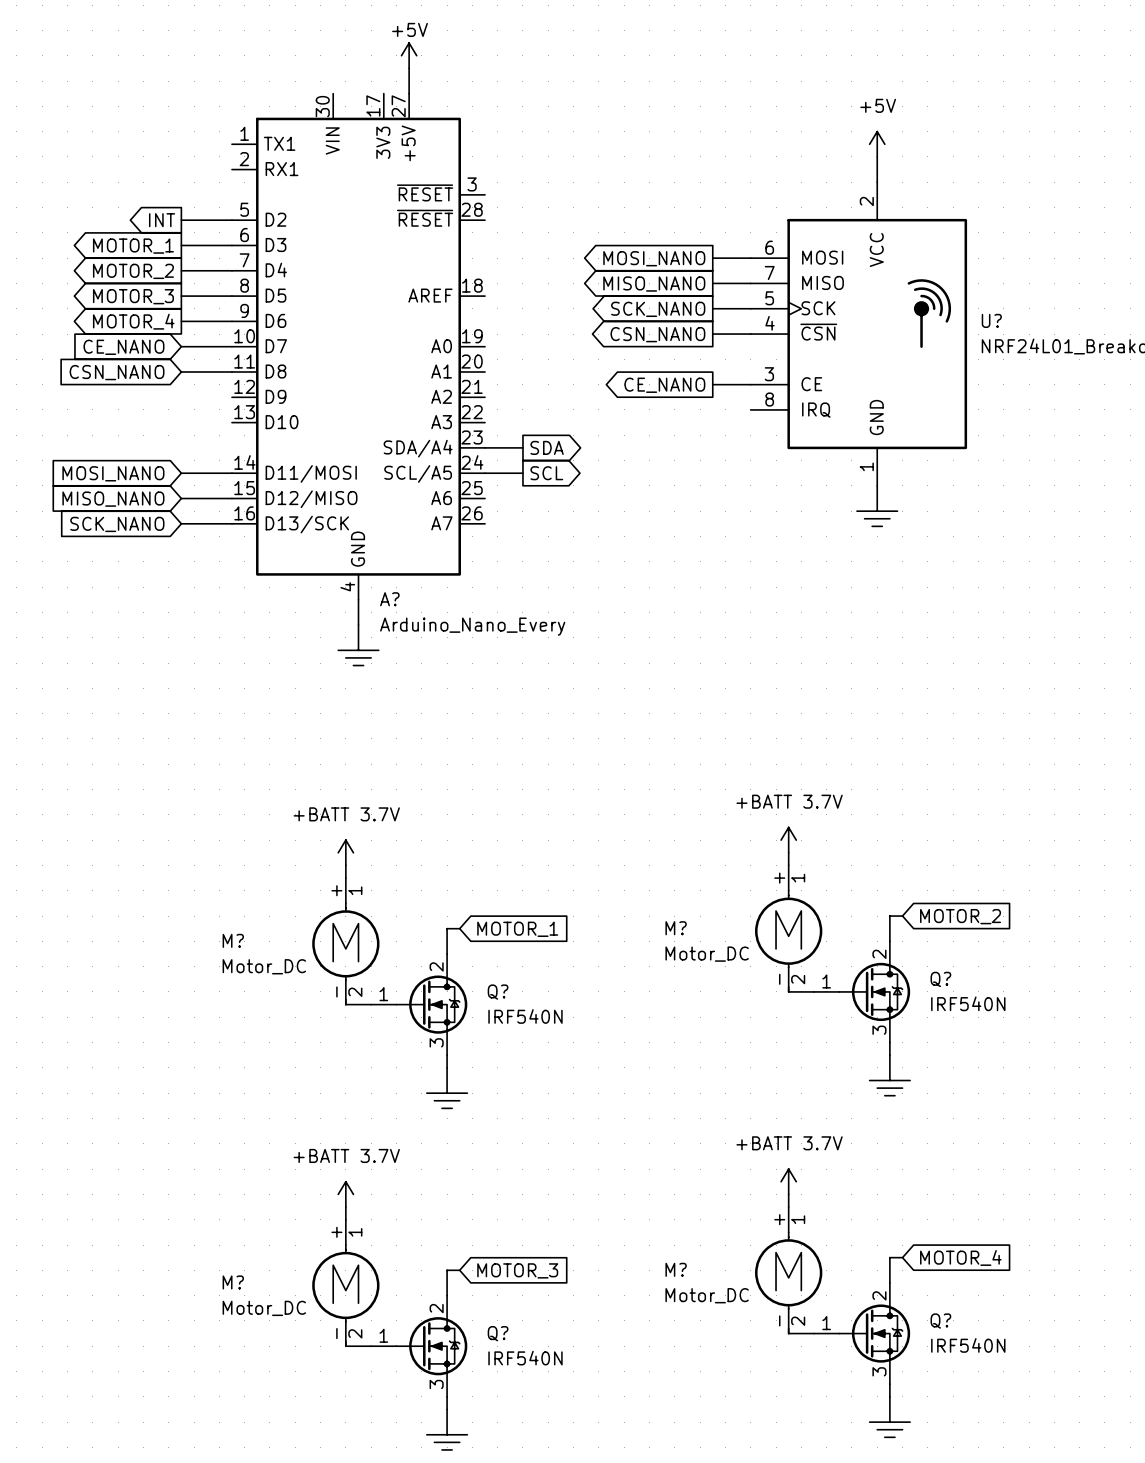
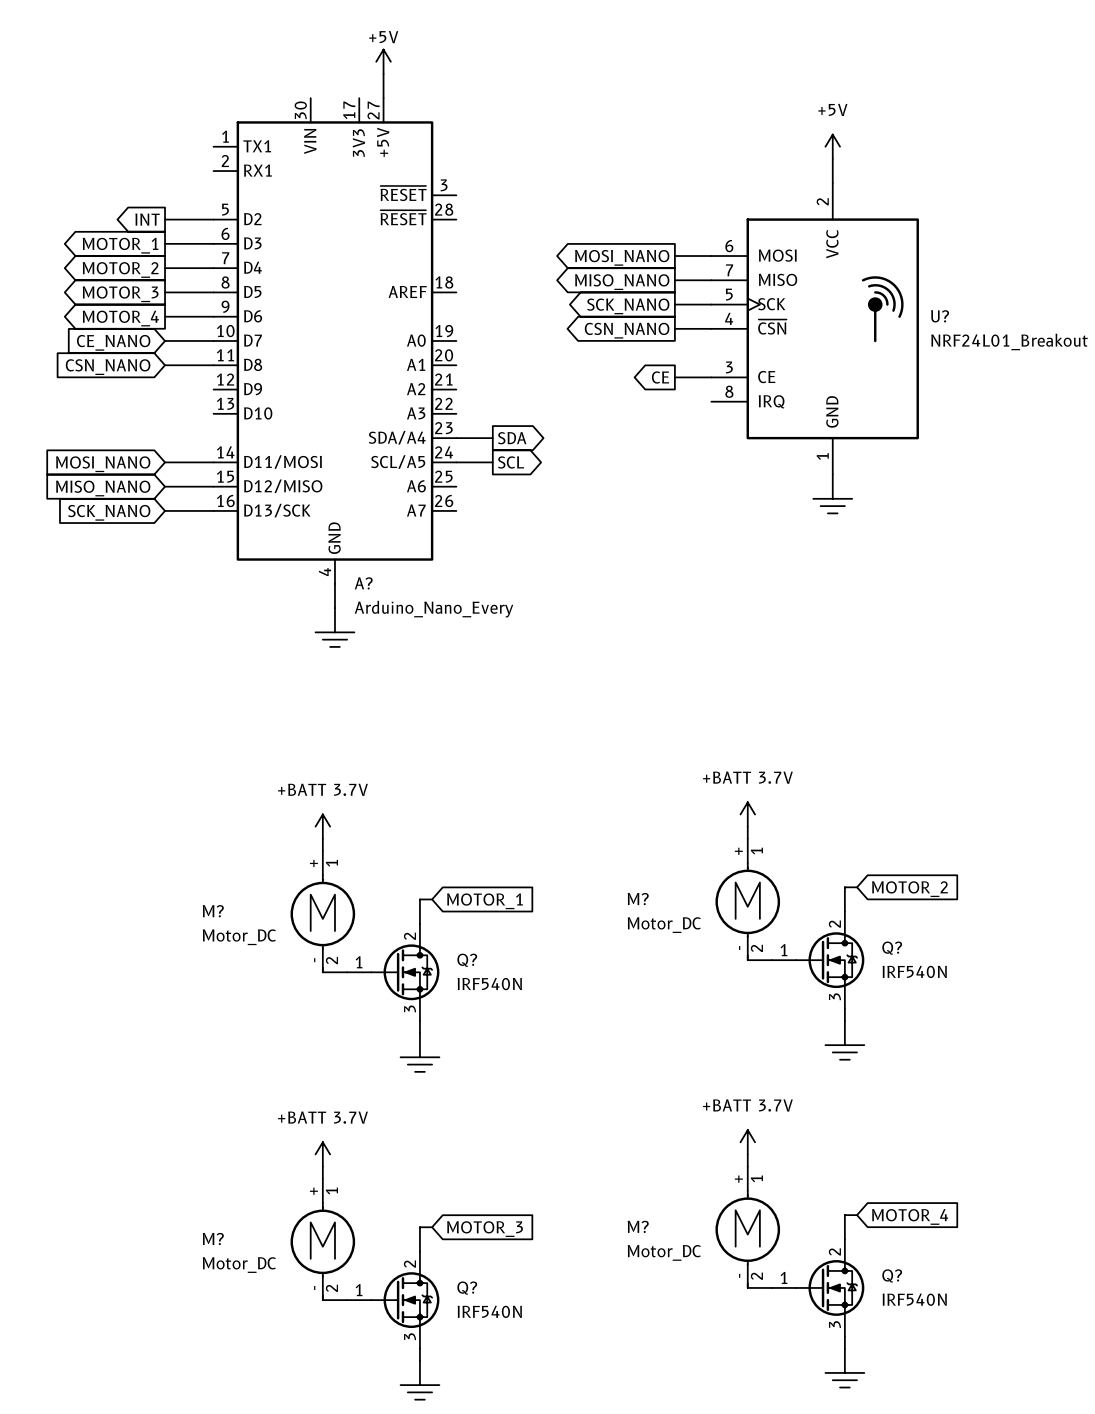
global label: CE_NANO (664, 385) -> CE (660, 377)

